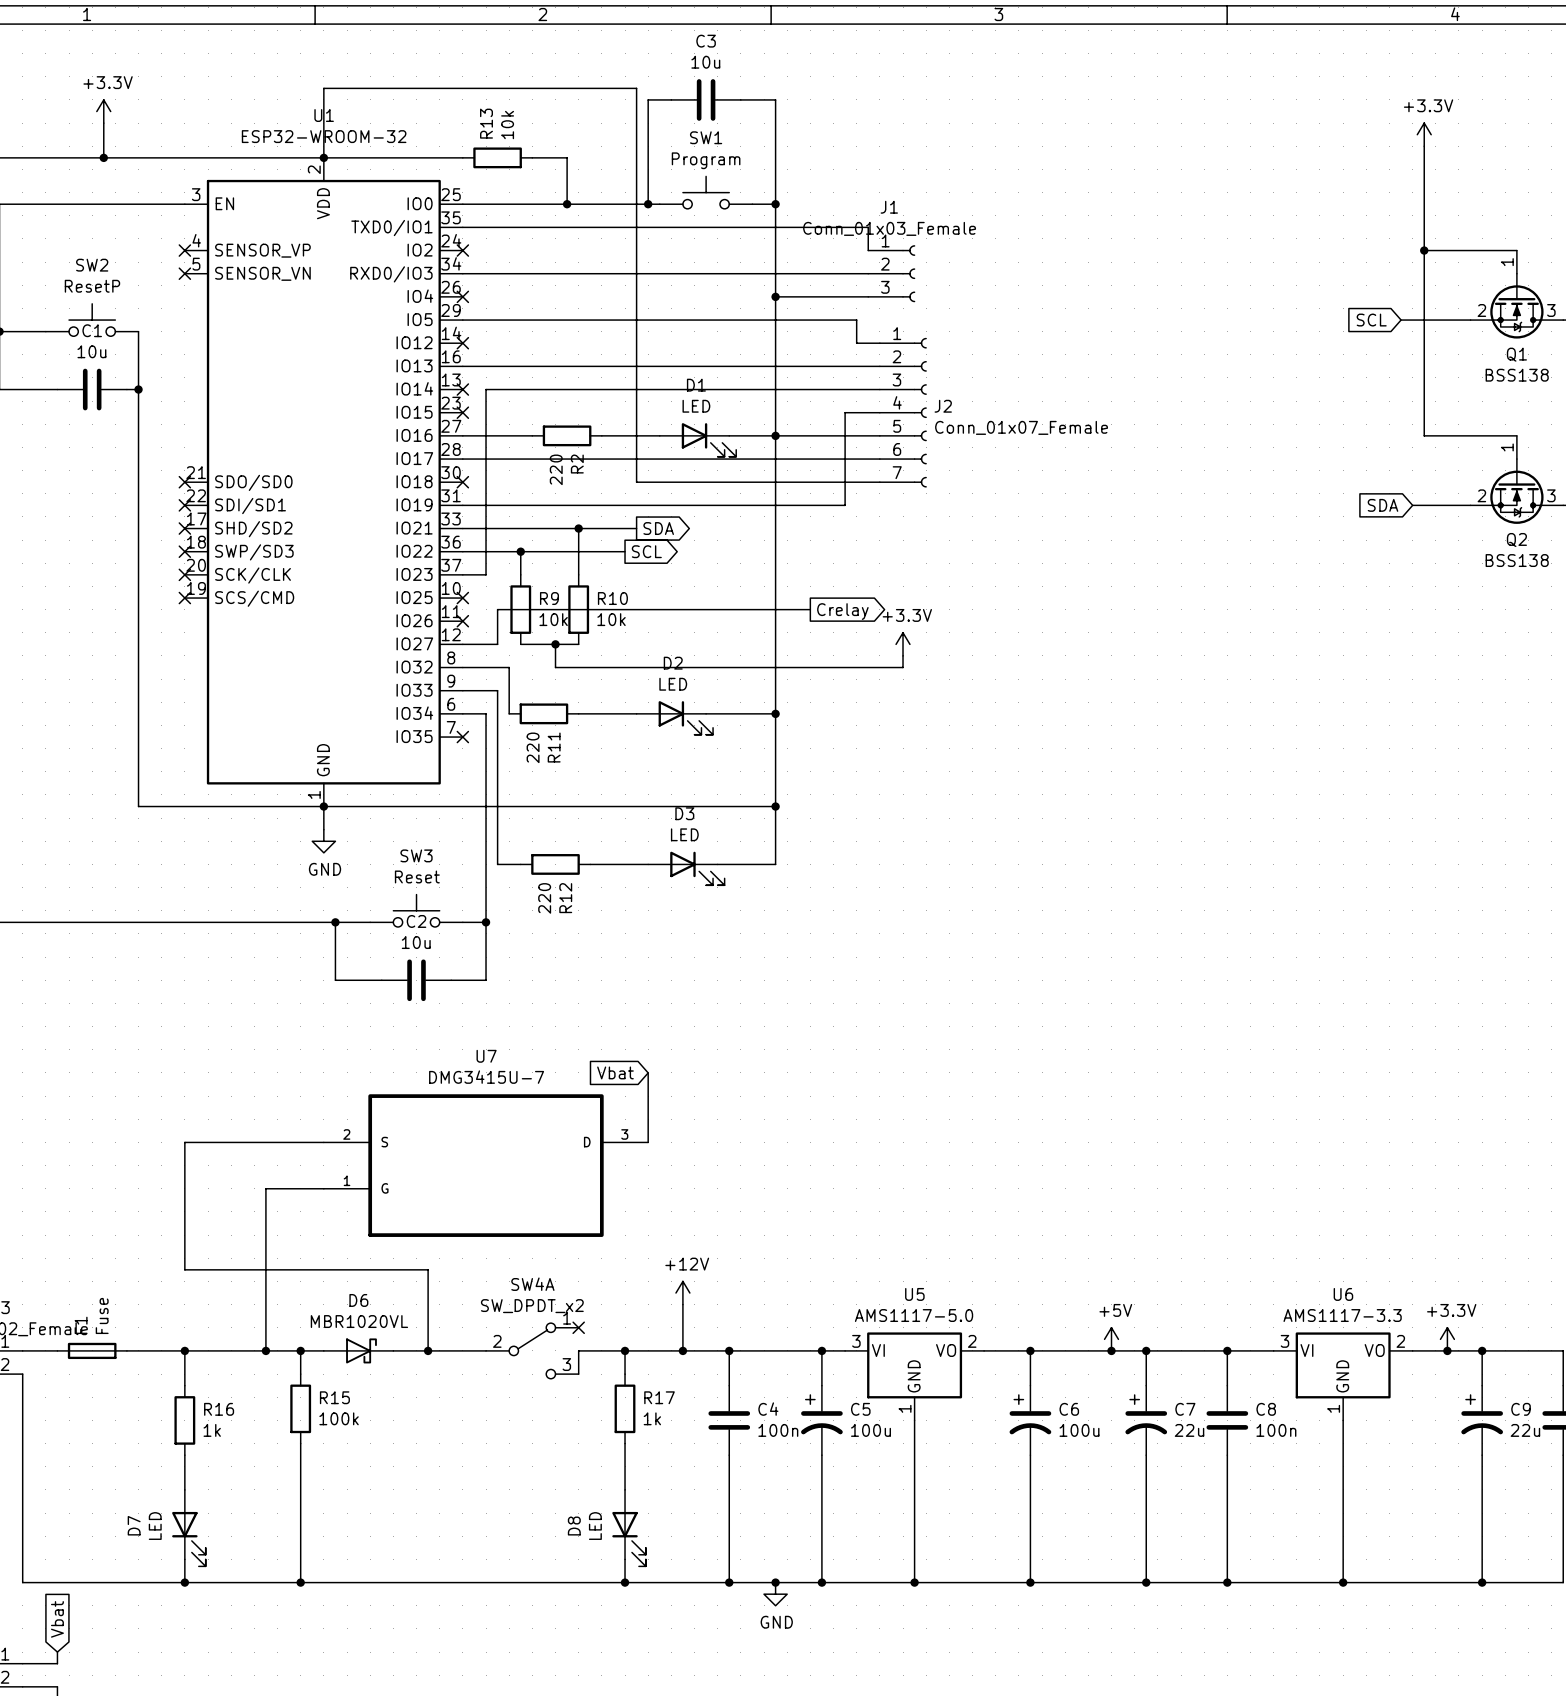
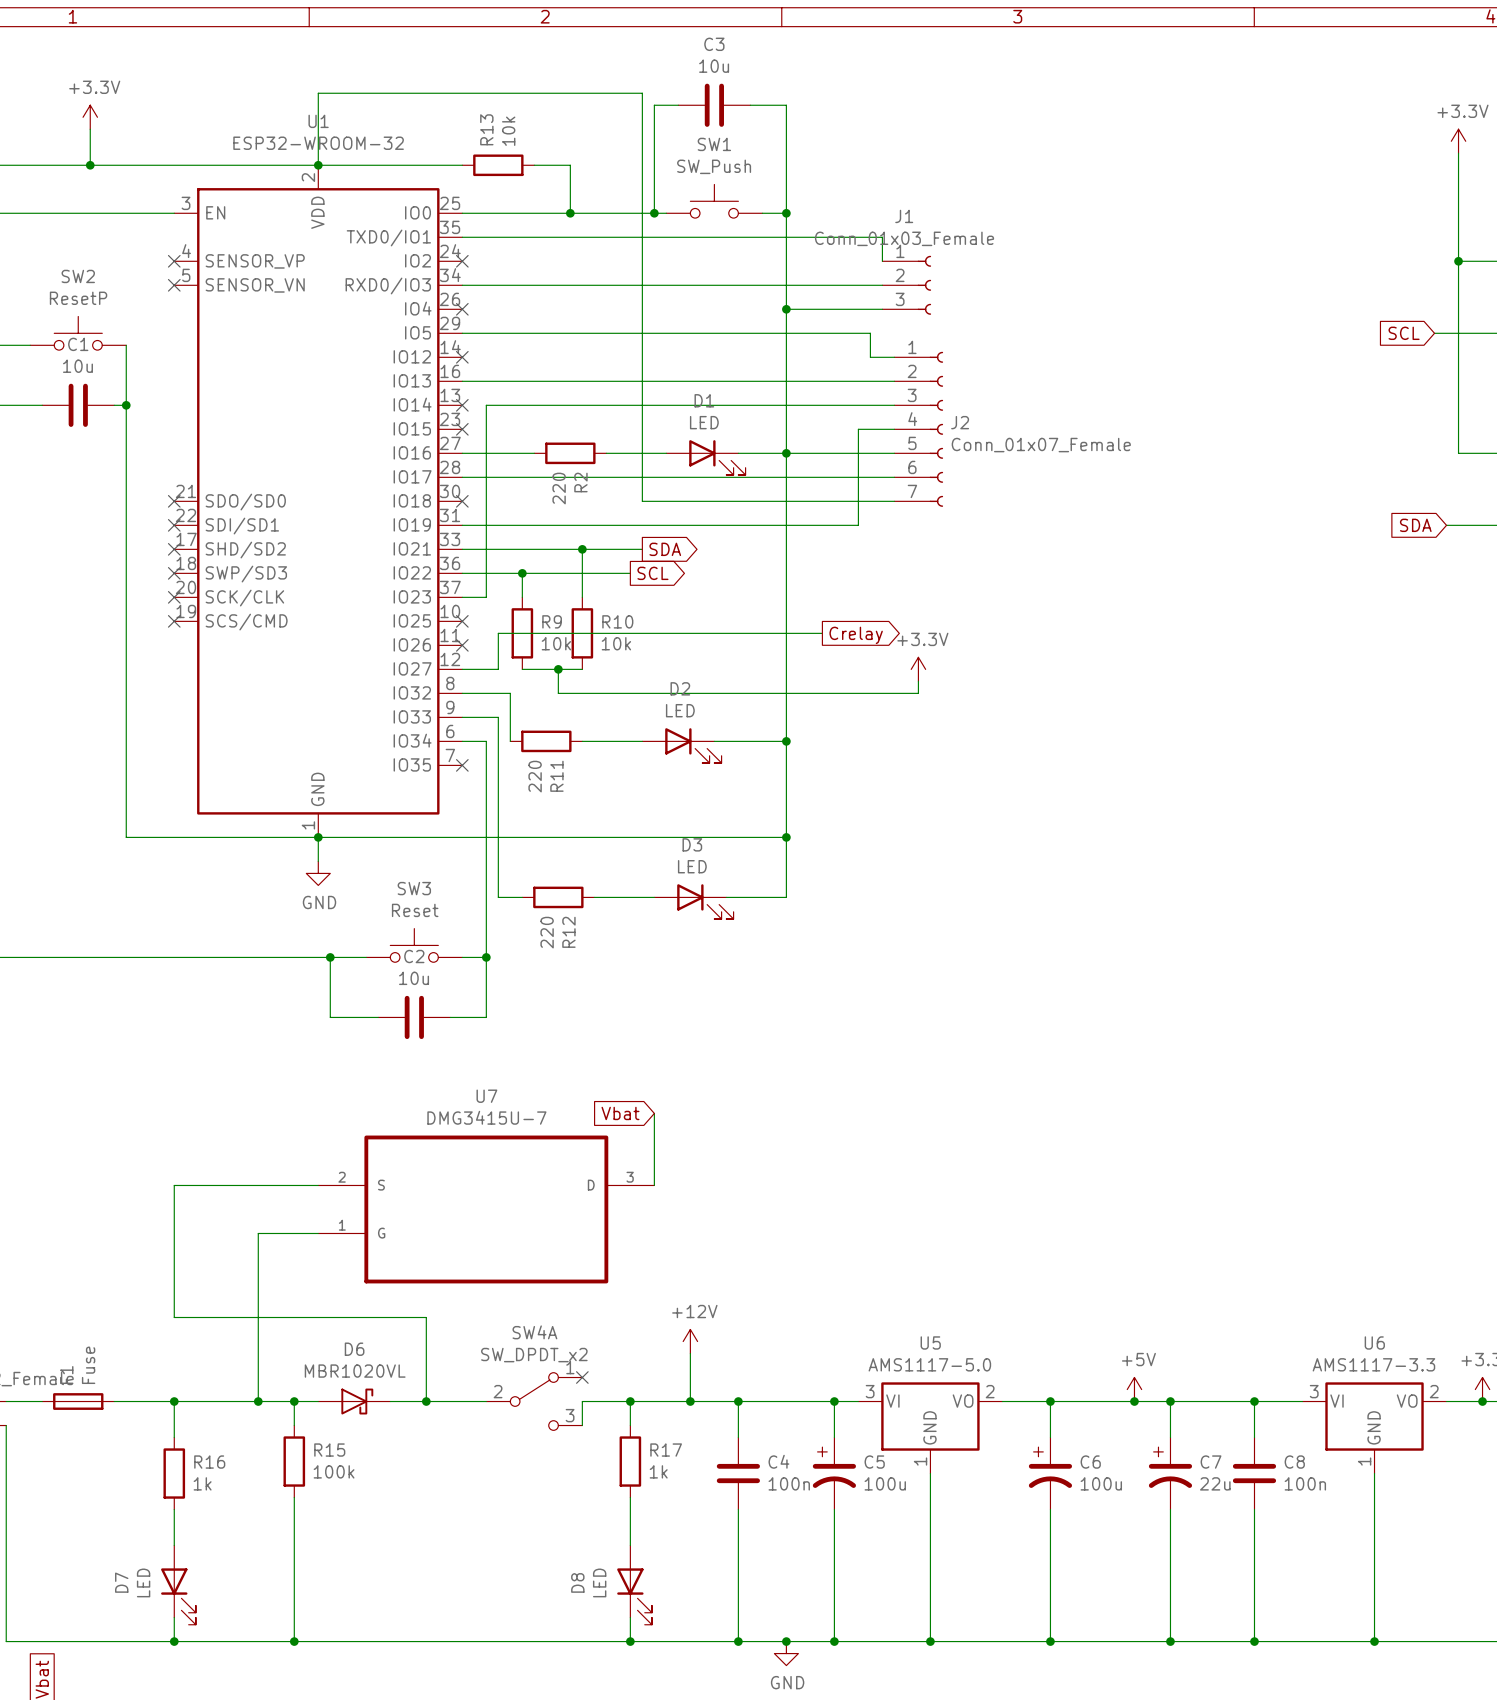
SW1 value: Program (706, 160) -> SW_Push (714, 166)

